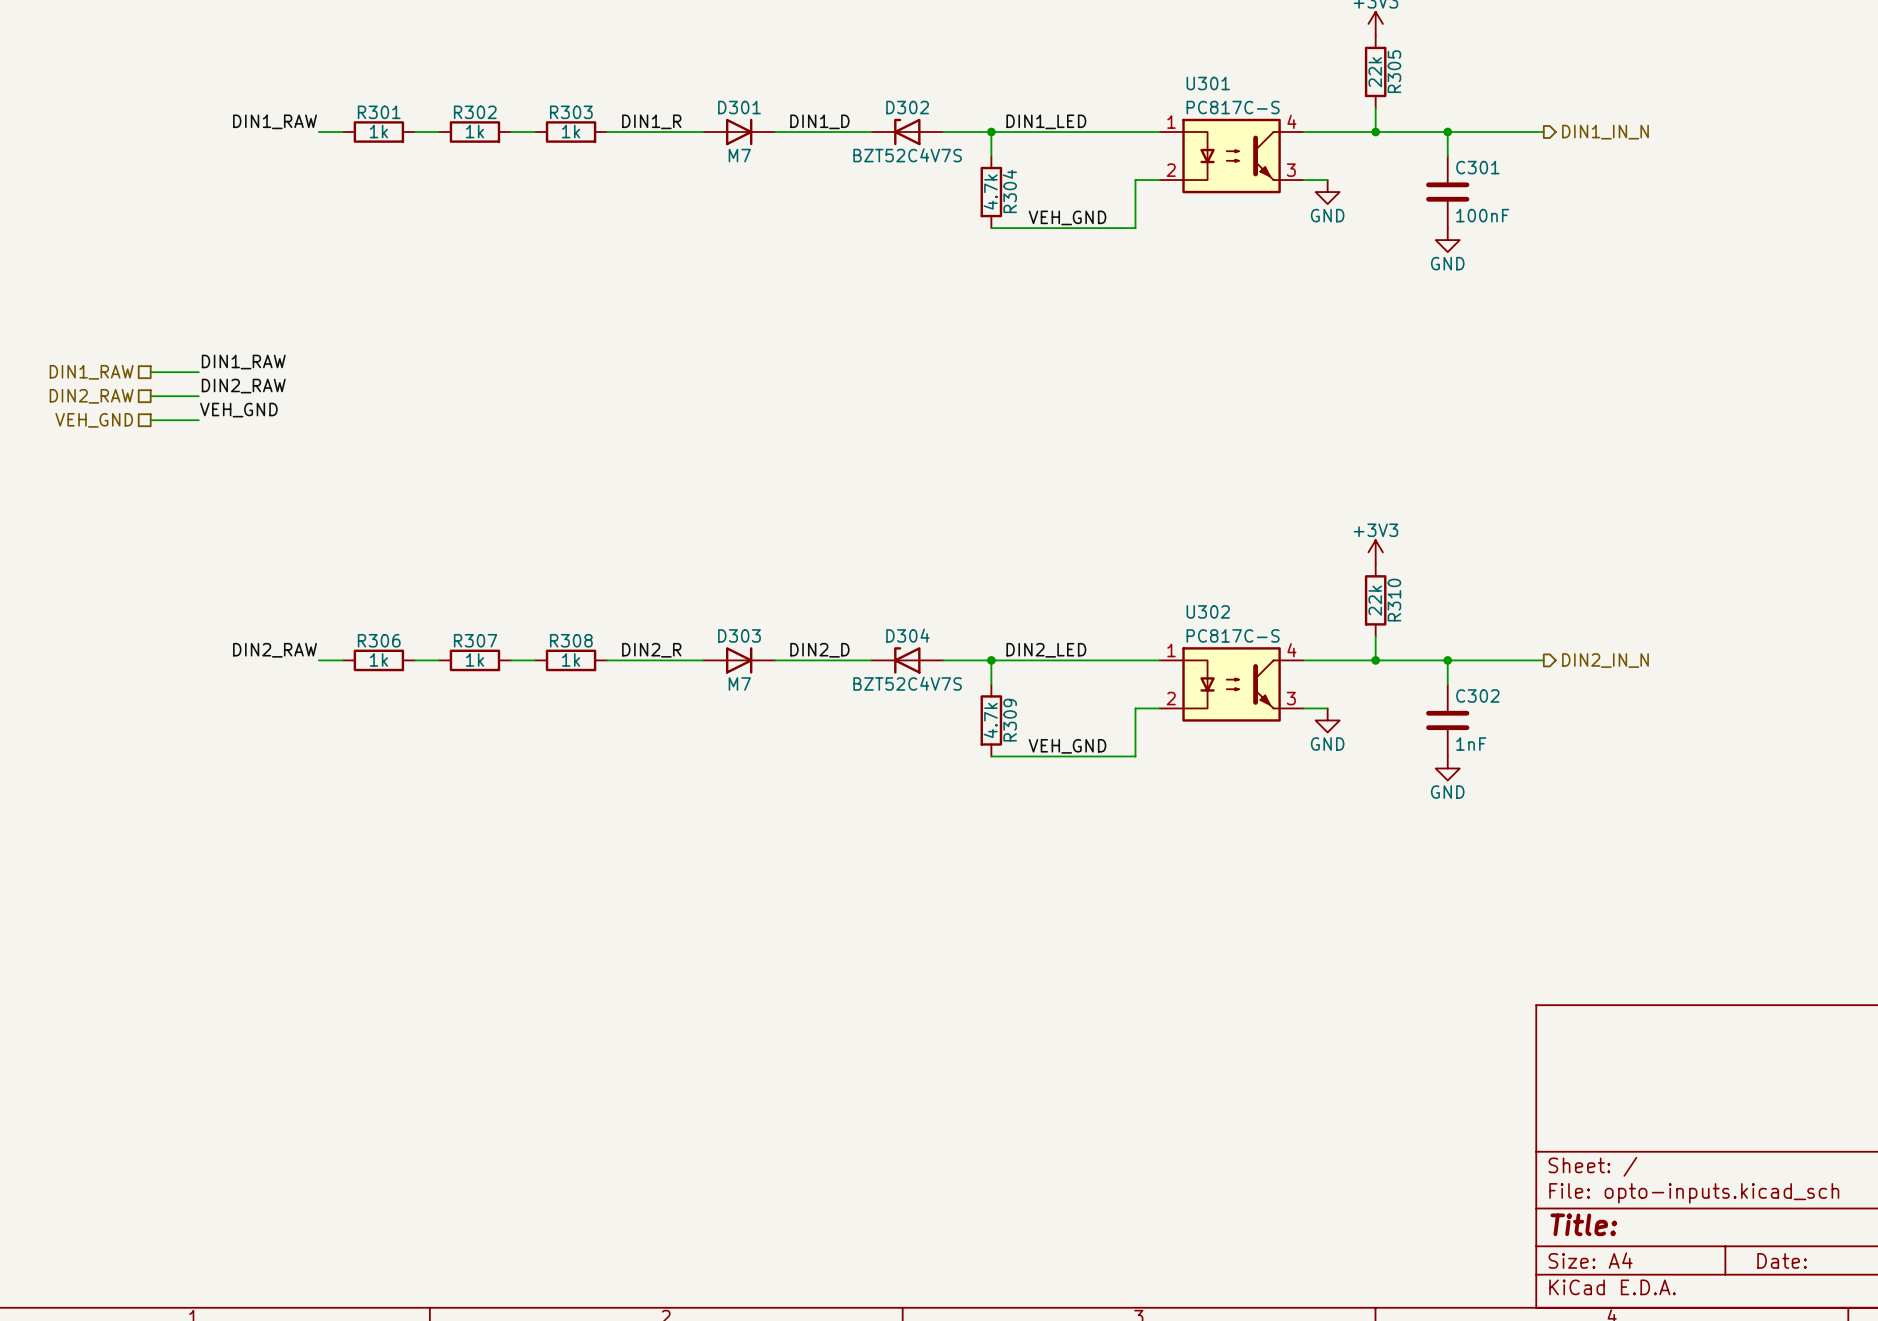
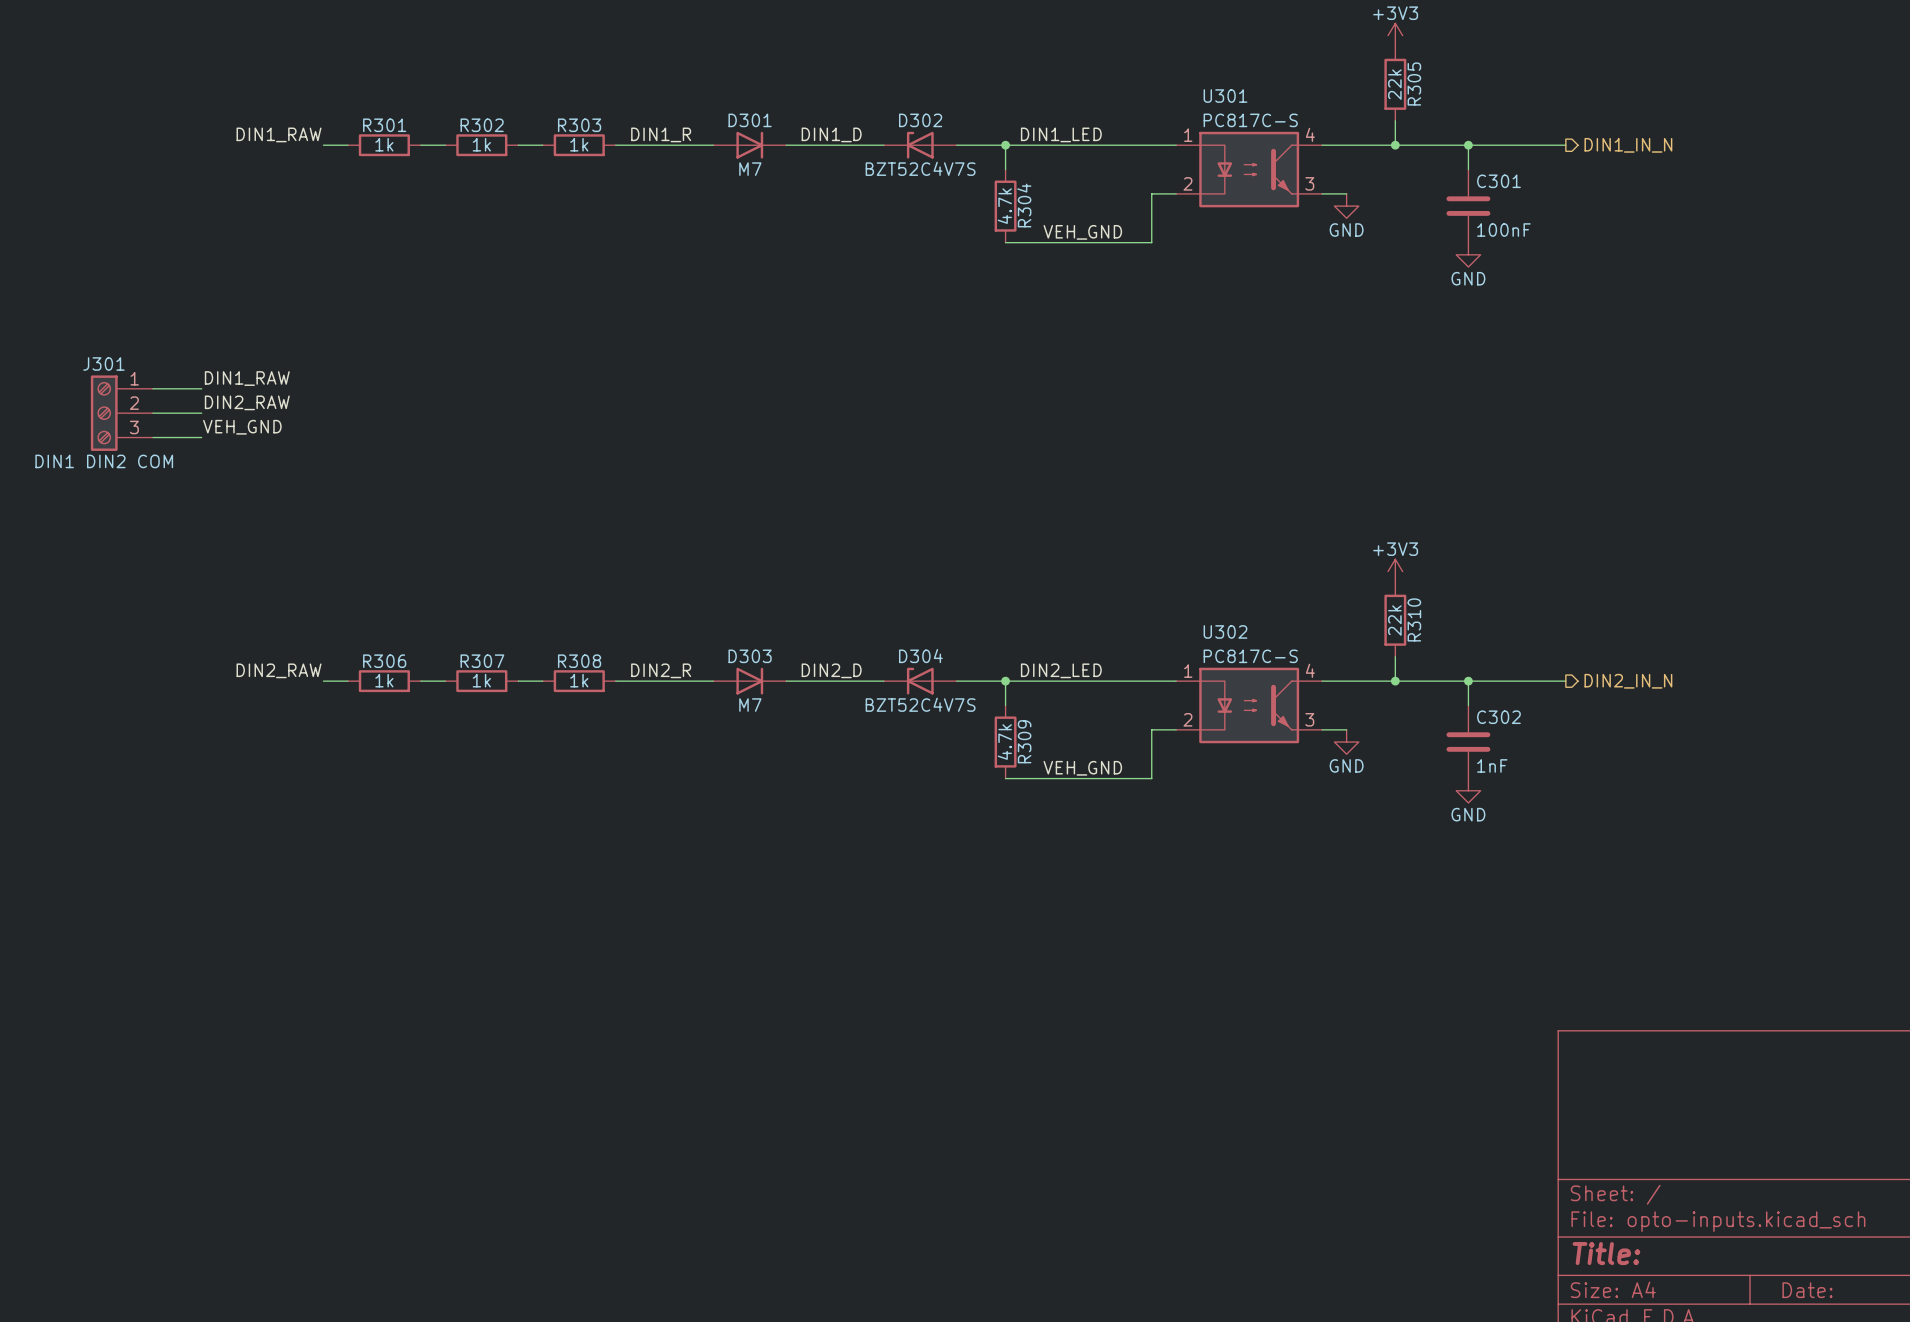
hierarchical label: DIN1_RAW (91, 372) -> none
hierarchical label: DIN2_RAW (91, 396) -> none
J301: none -> DIN1 DIN2 COM (121, 413)
hierarchical label: VEH_GND (94, 420) -> none

